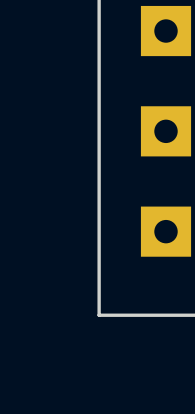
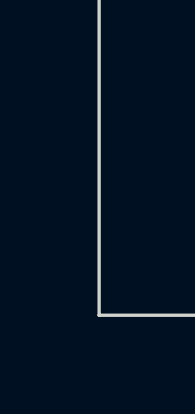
part: (166, 31) -> none
part: (166, 131) -> none
part: (166, 231) -> none

